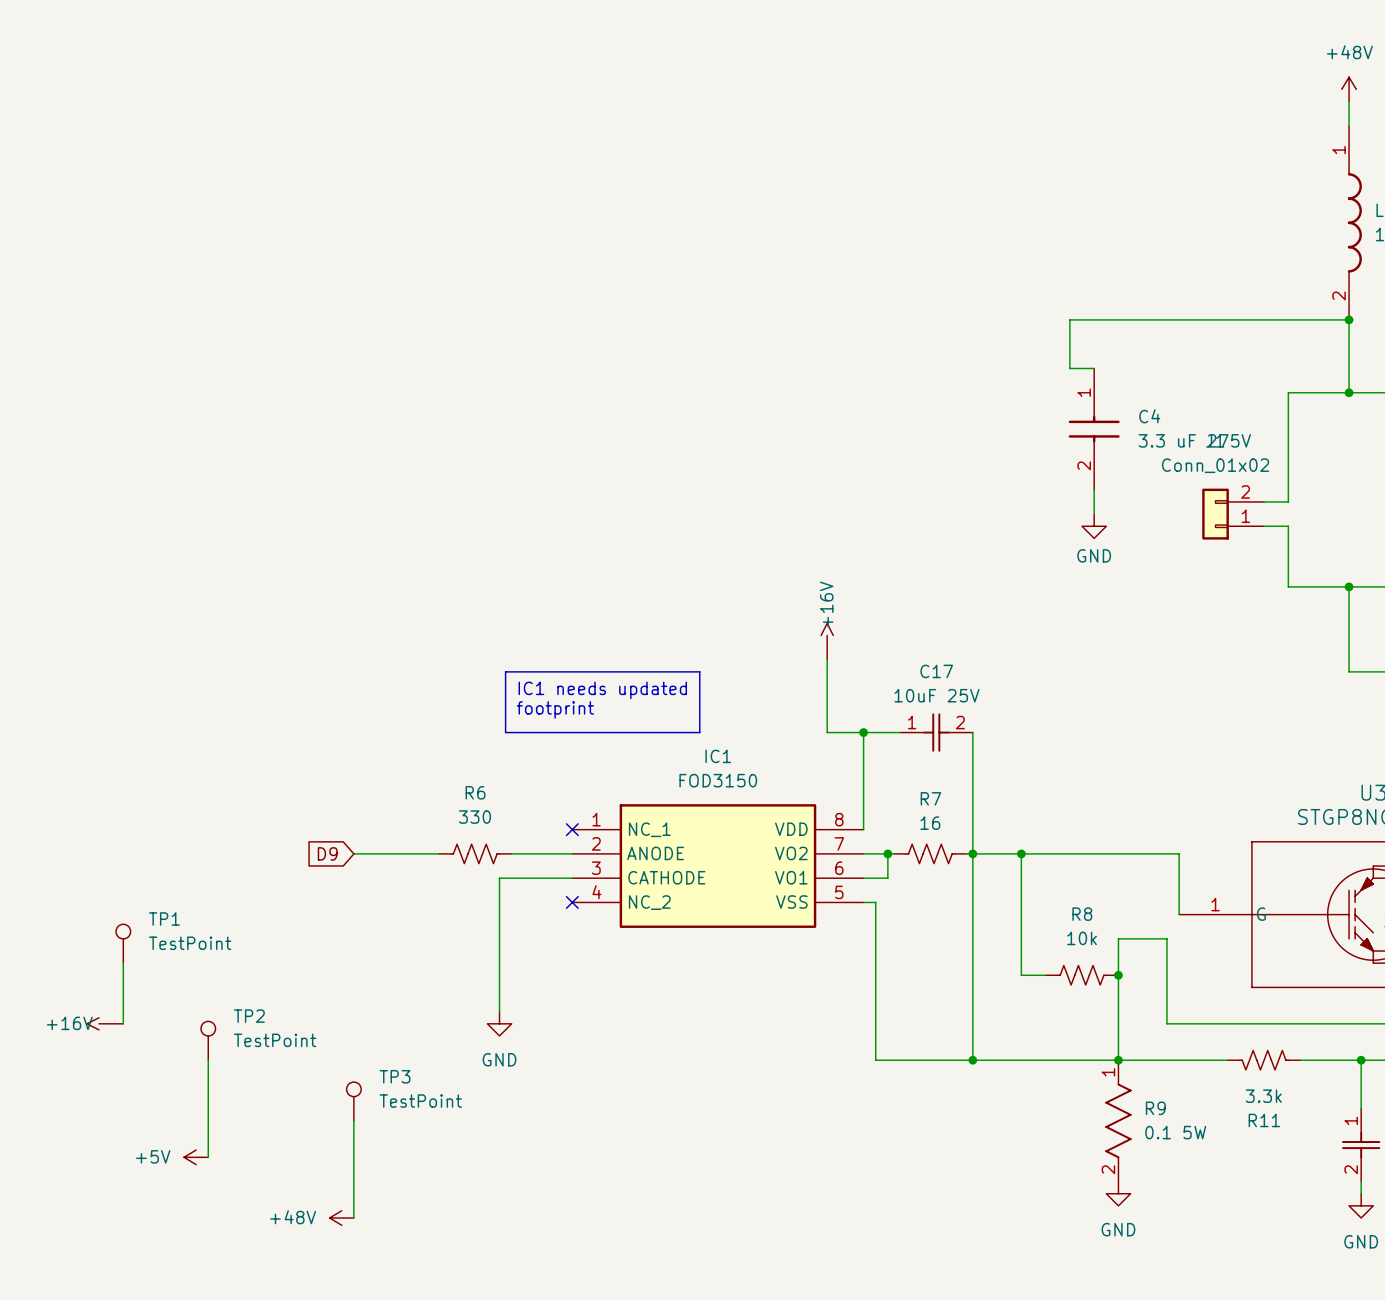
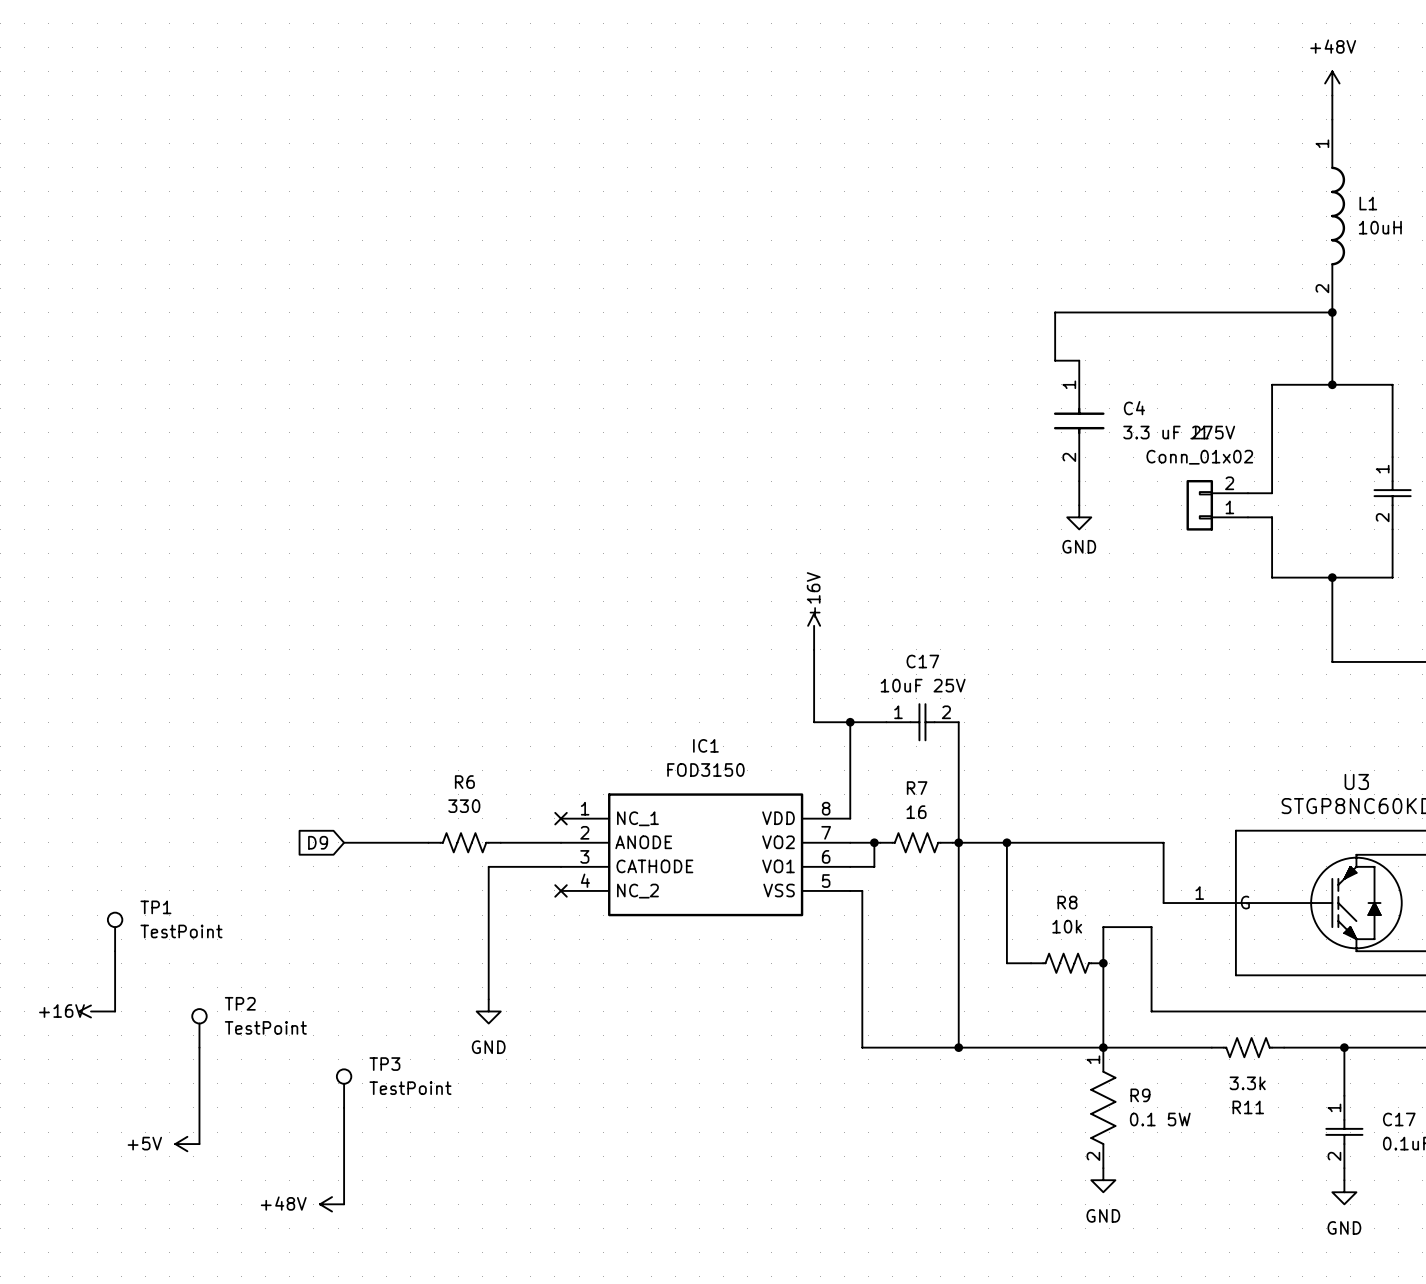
line: (505, 671) (699, 671) (699, 732) (505, 732) (505, 671) -> none
text: IC1 needs updated (602, 690) -> none
text: footprint (555, 709) -> none

